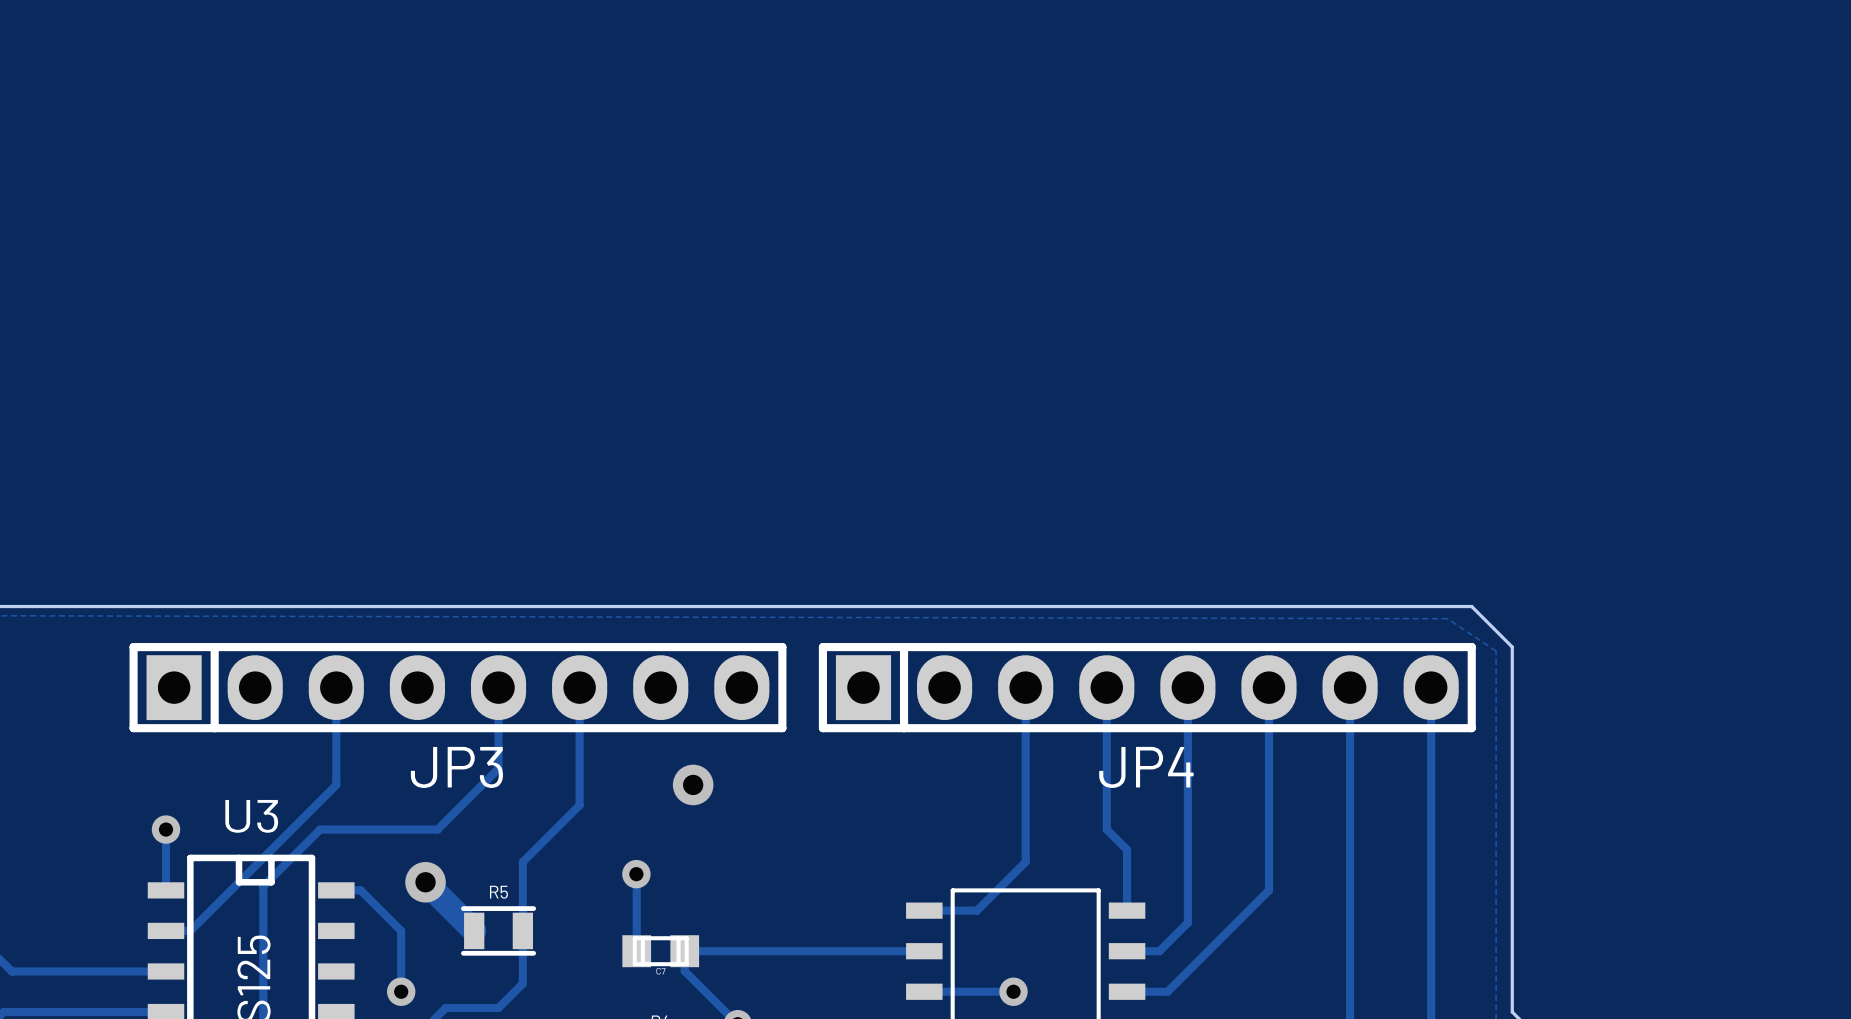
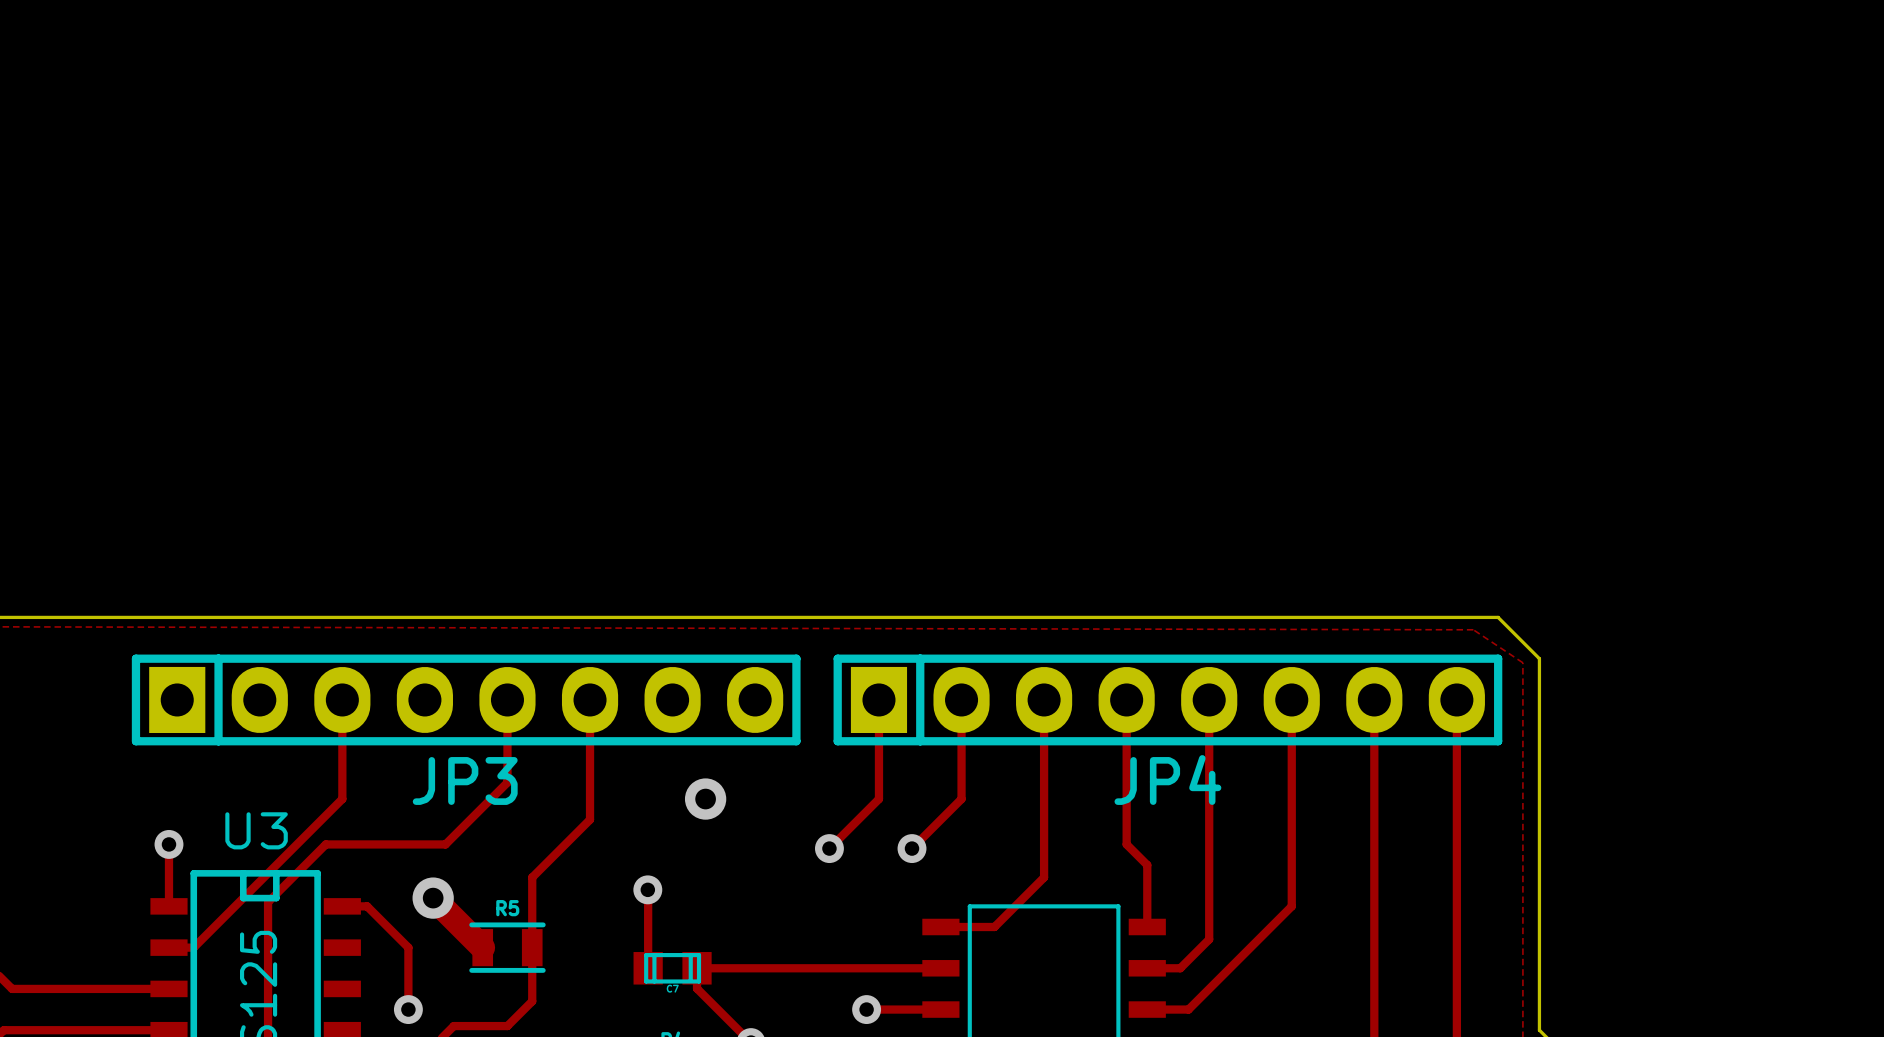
track: none -> (878, 699) (878, 799) (829, 848)
track: none -> (961, 699) (961, 799) (912, 848)
via: none -> (829, 848)
via: none -> (912, 848)
via: none -> (866, 1009)
track: (924, 991) (1013, 991) -> (940, 1009) (866, 1009)
via: (1013, 991) -> none

